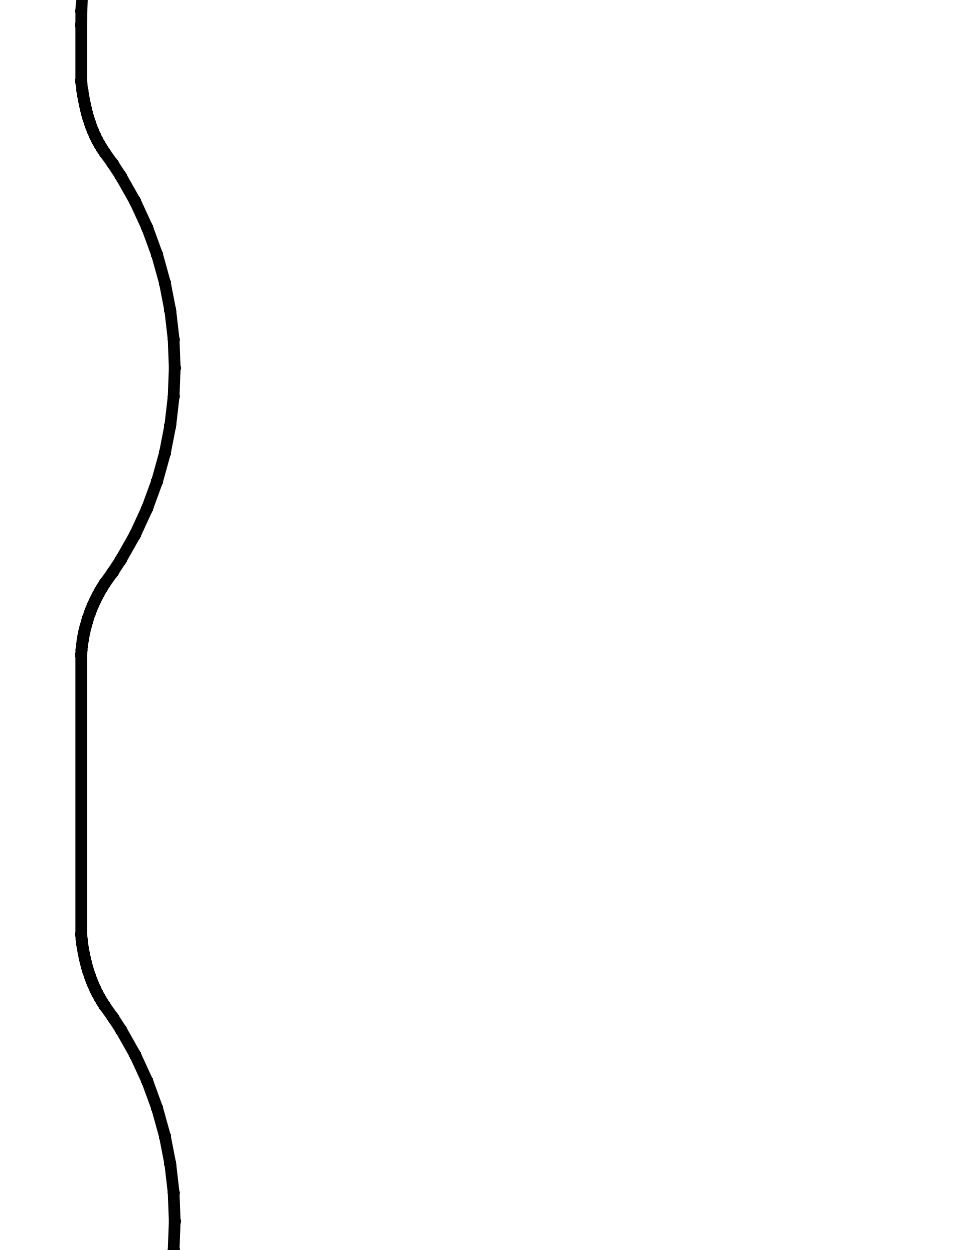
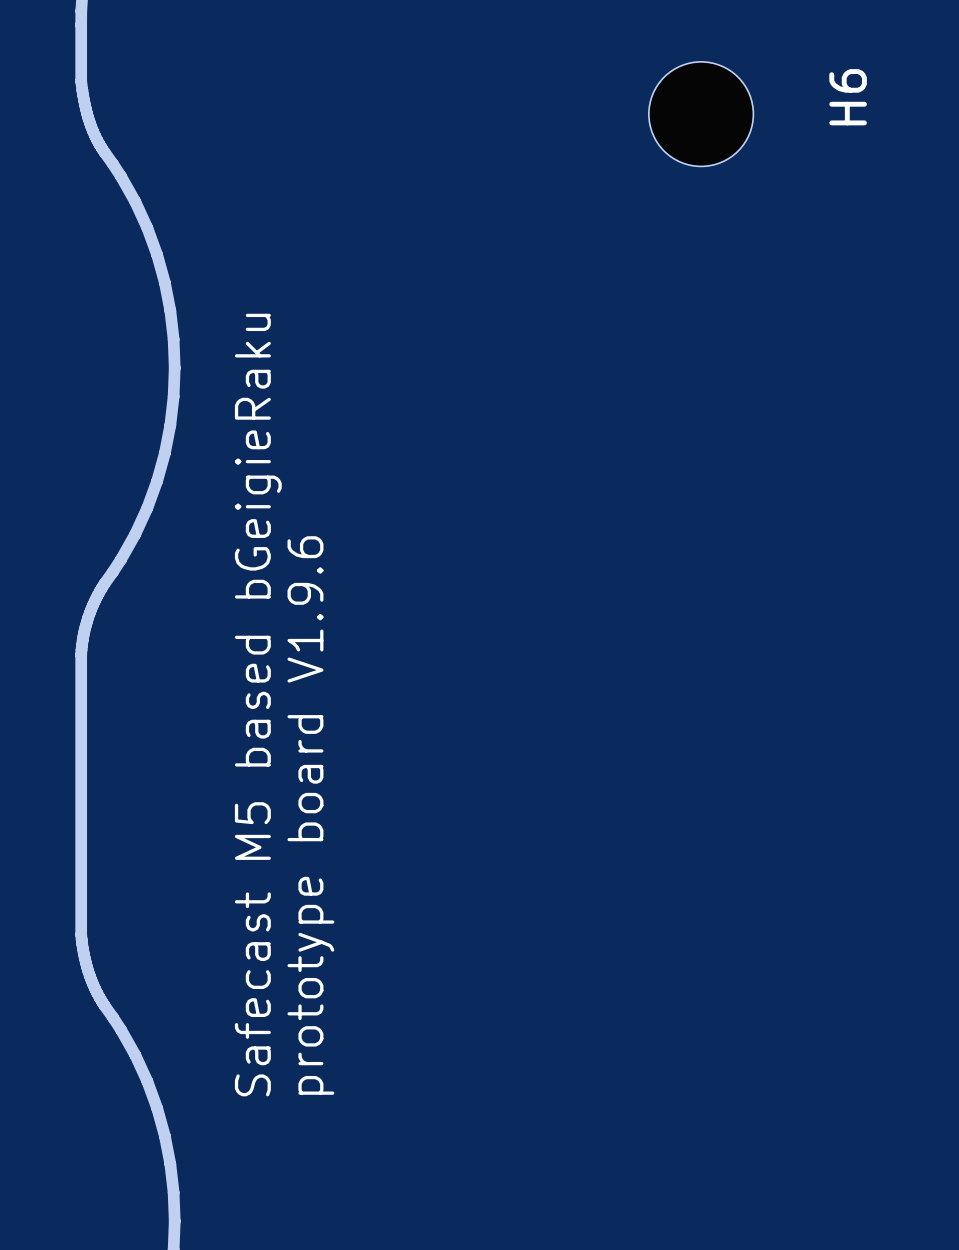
H6: none -> (701, 114)
text: none -> Safecast M5 based bGeigieRaku (258, 705)
text: none -> prototype board V1.9.6 (310, 815)

